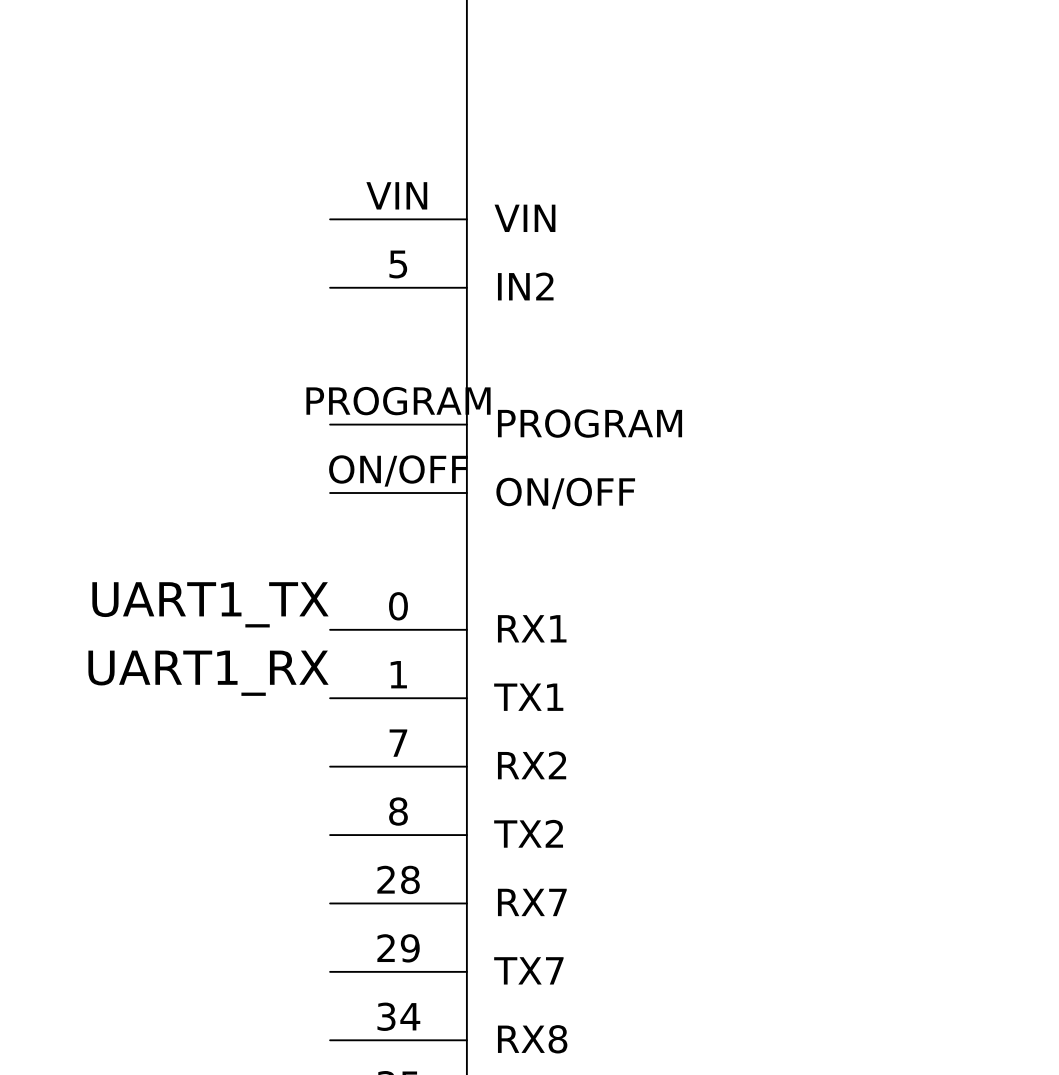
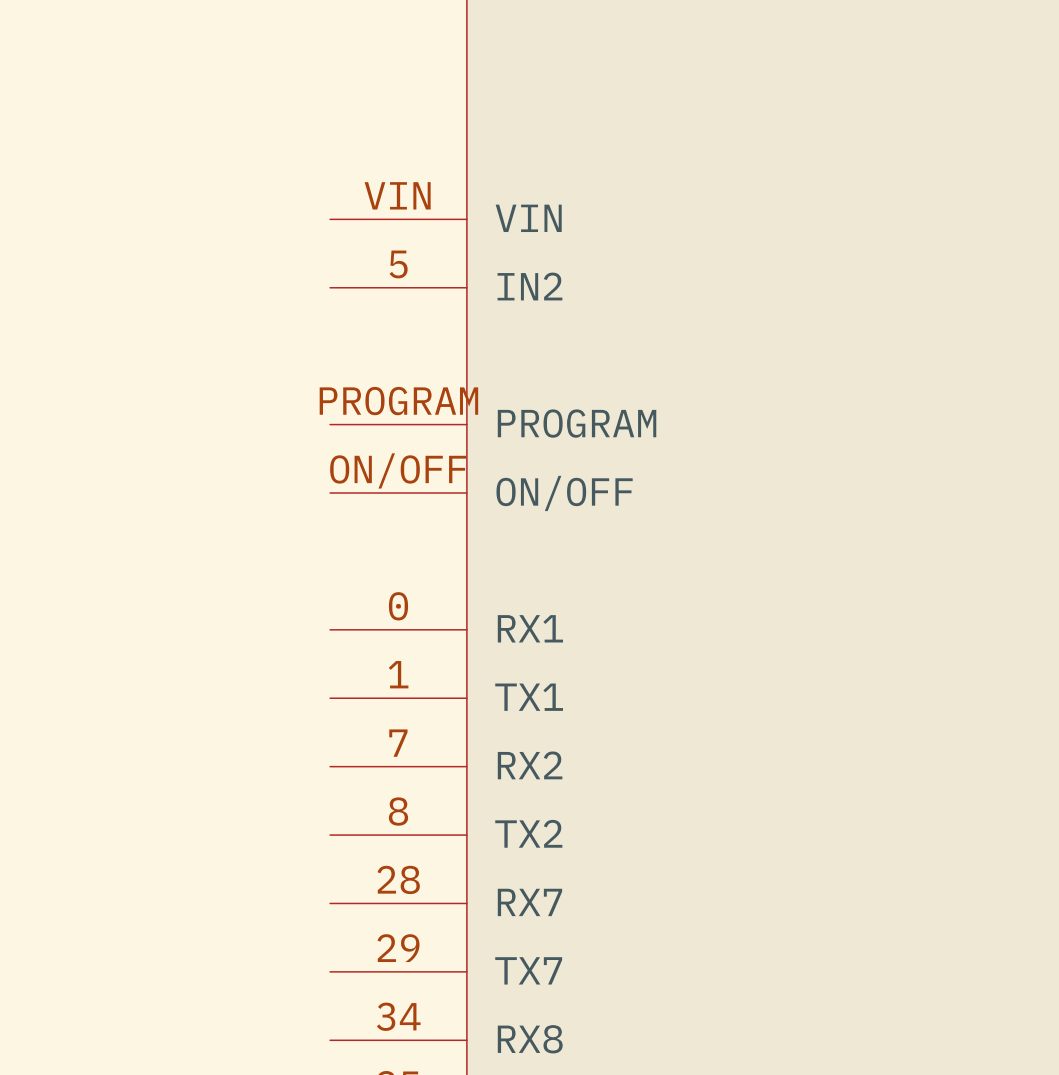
label: UART1_TX (210, 604) -> none
label: UART1_RX (208, 673) -> none

